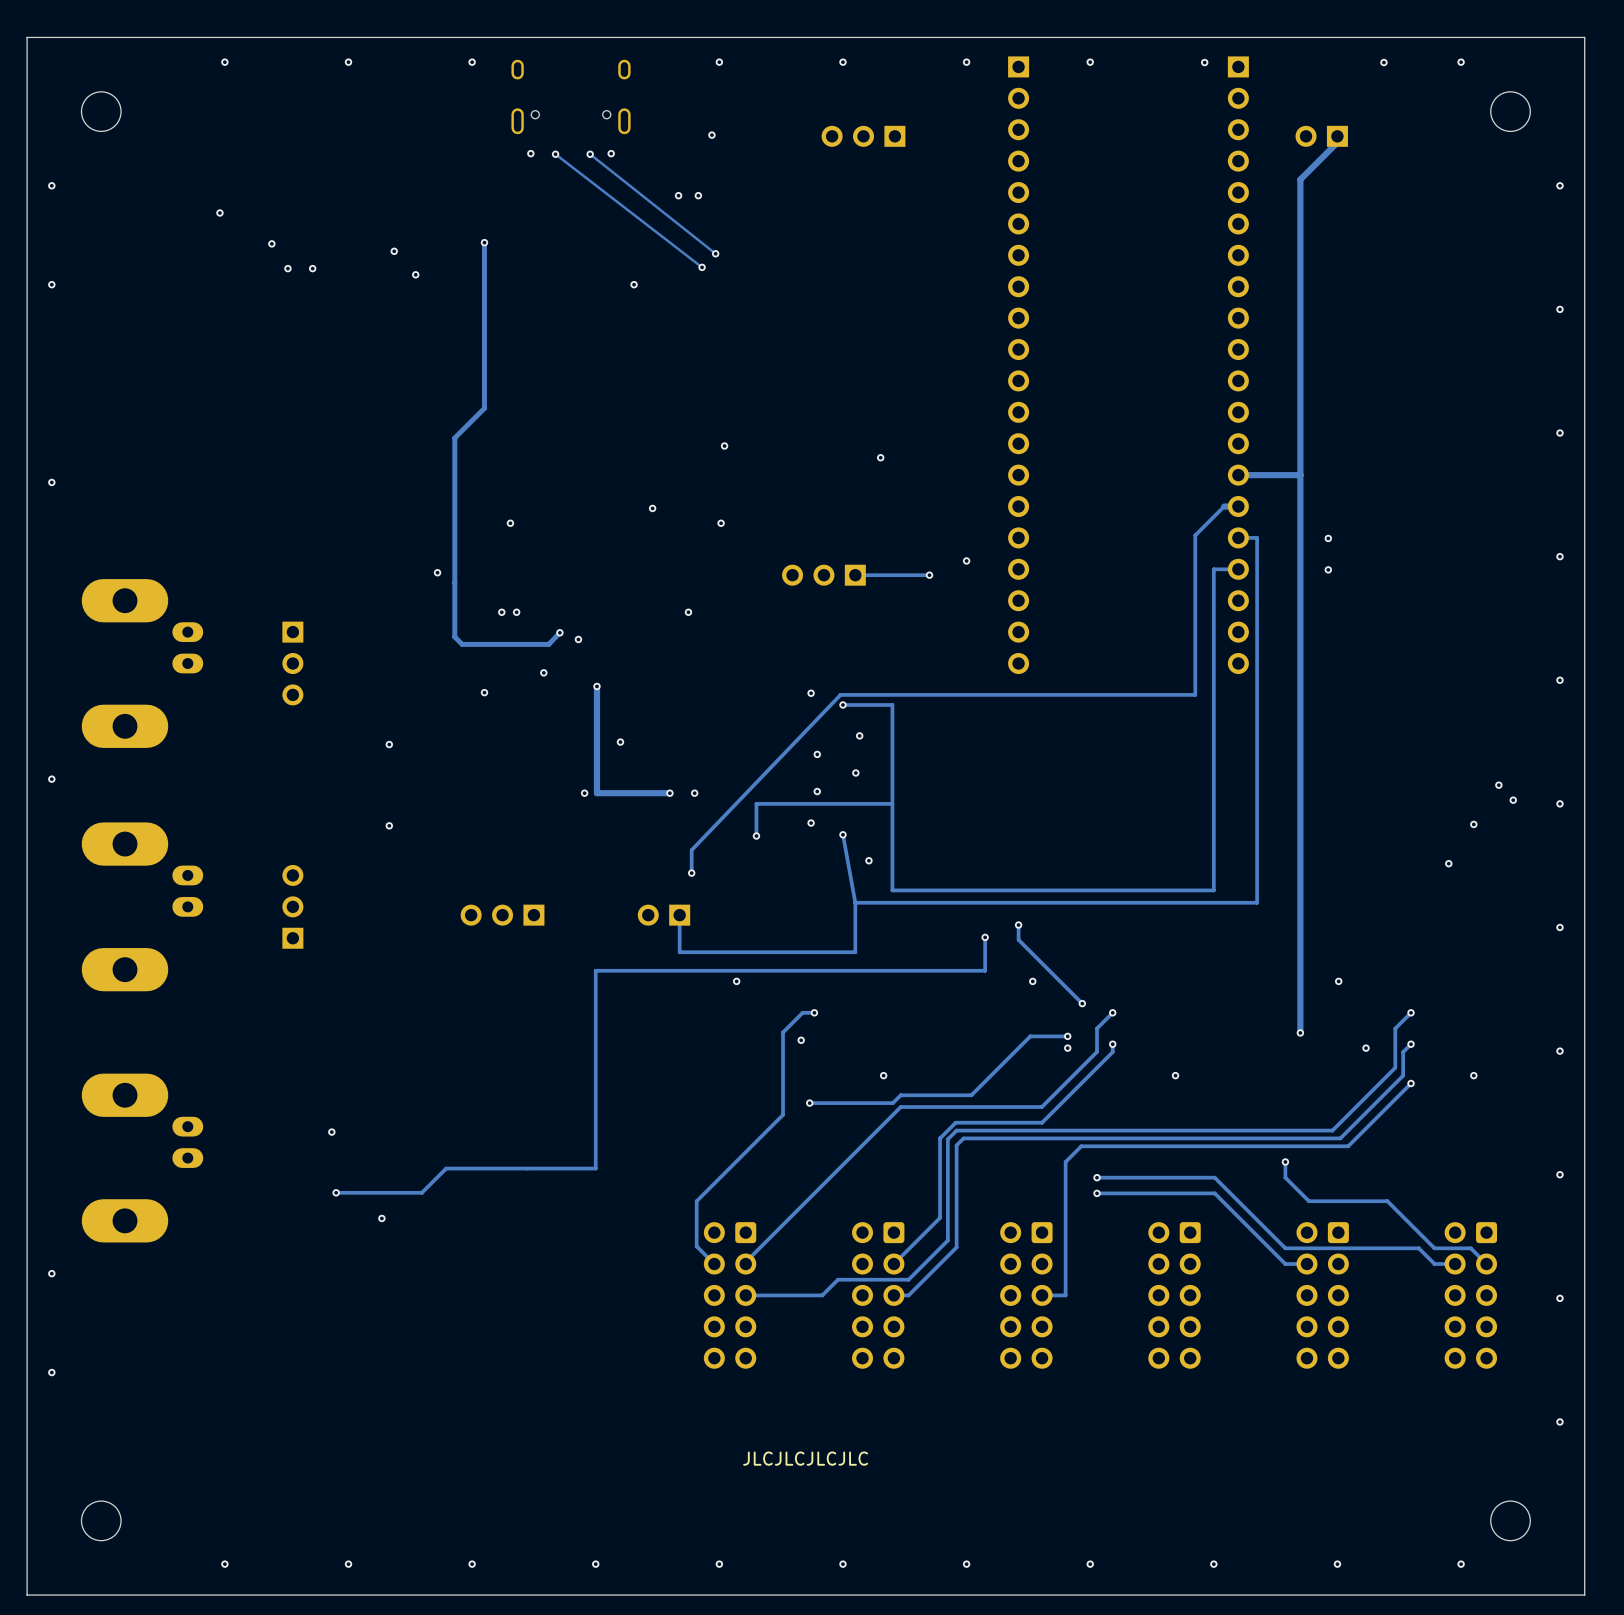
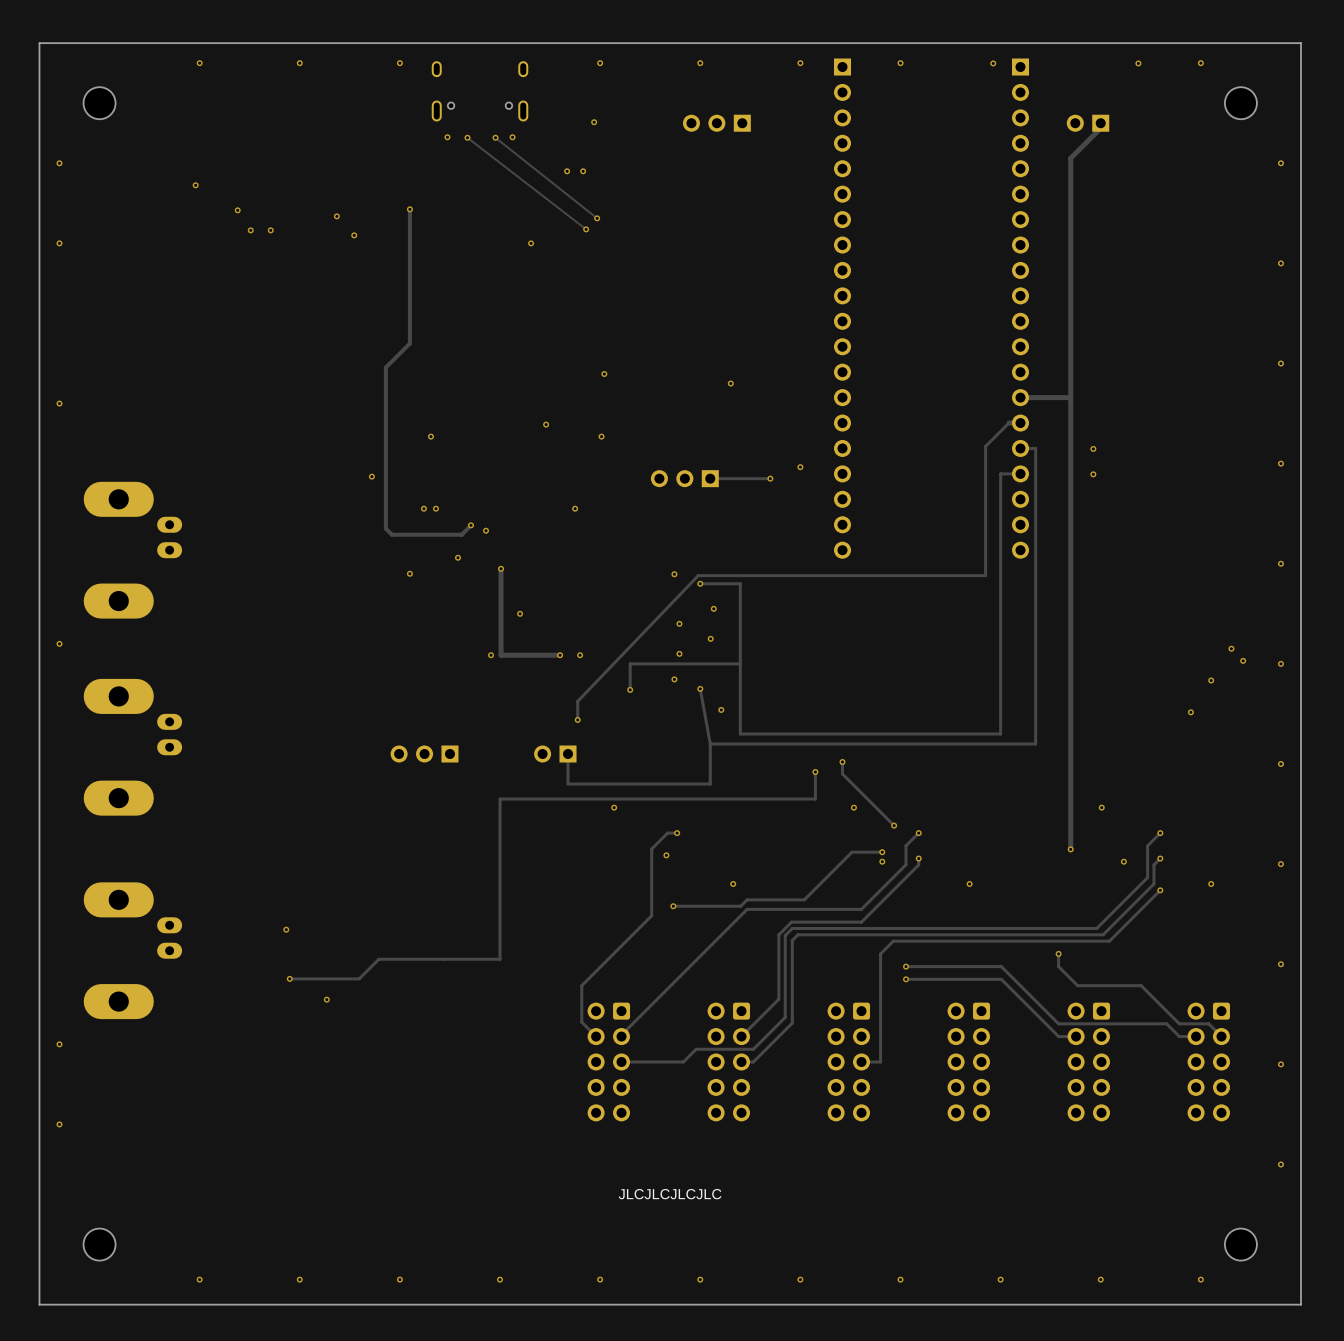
part: (292, 663) -> none
via: (389, 744) -> none
via: (389, 825) -> none
part: (292, 906) -> none

